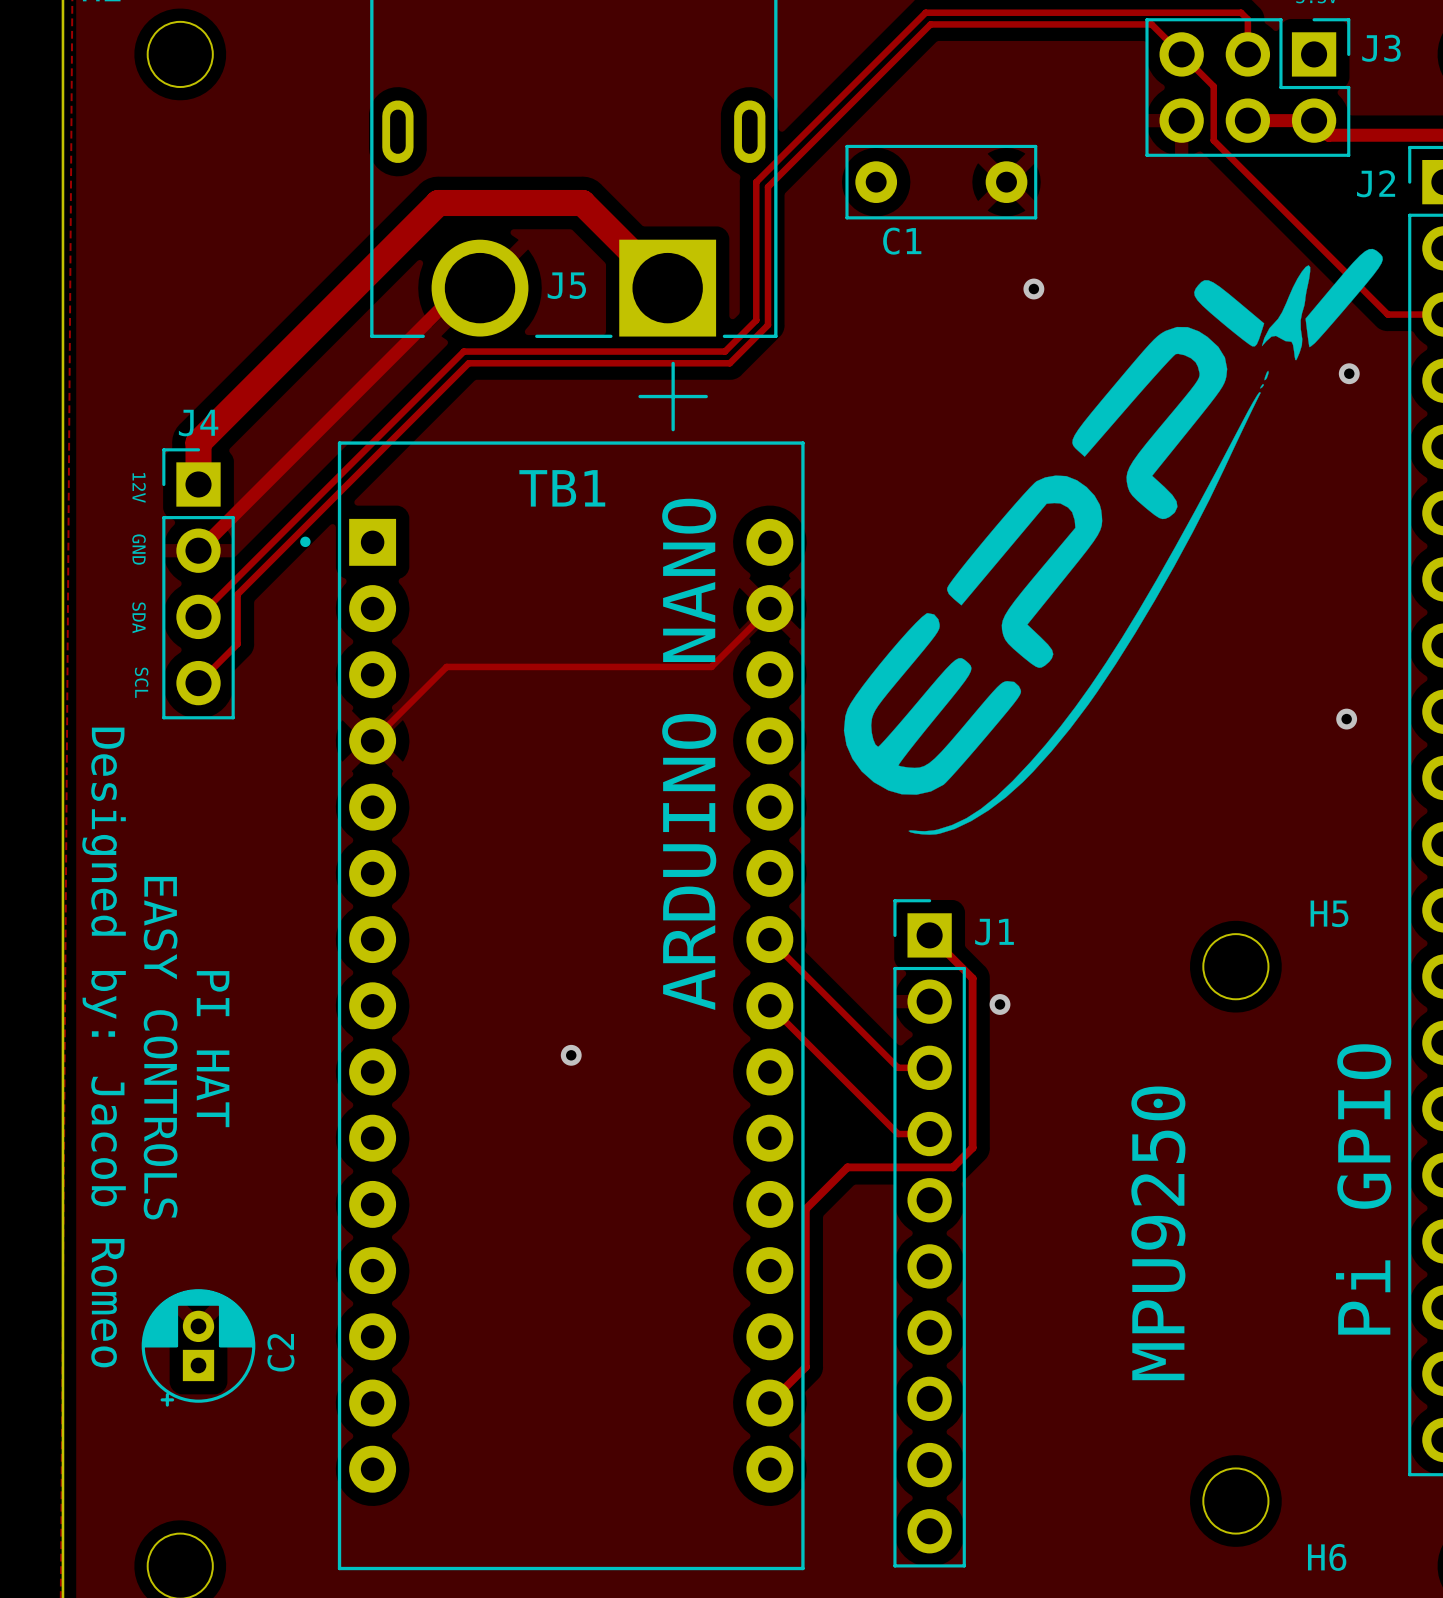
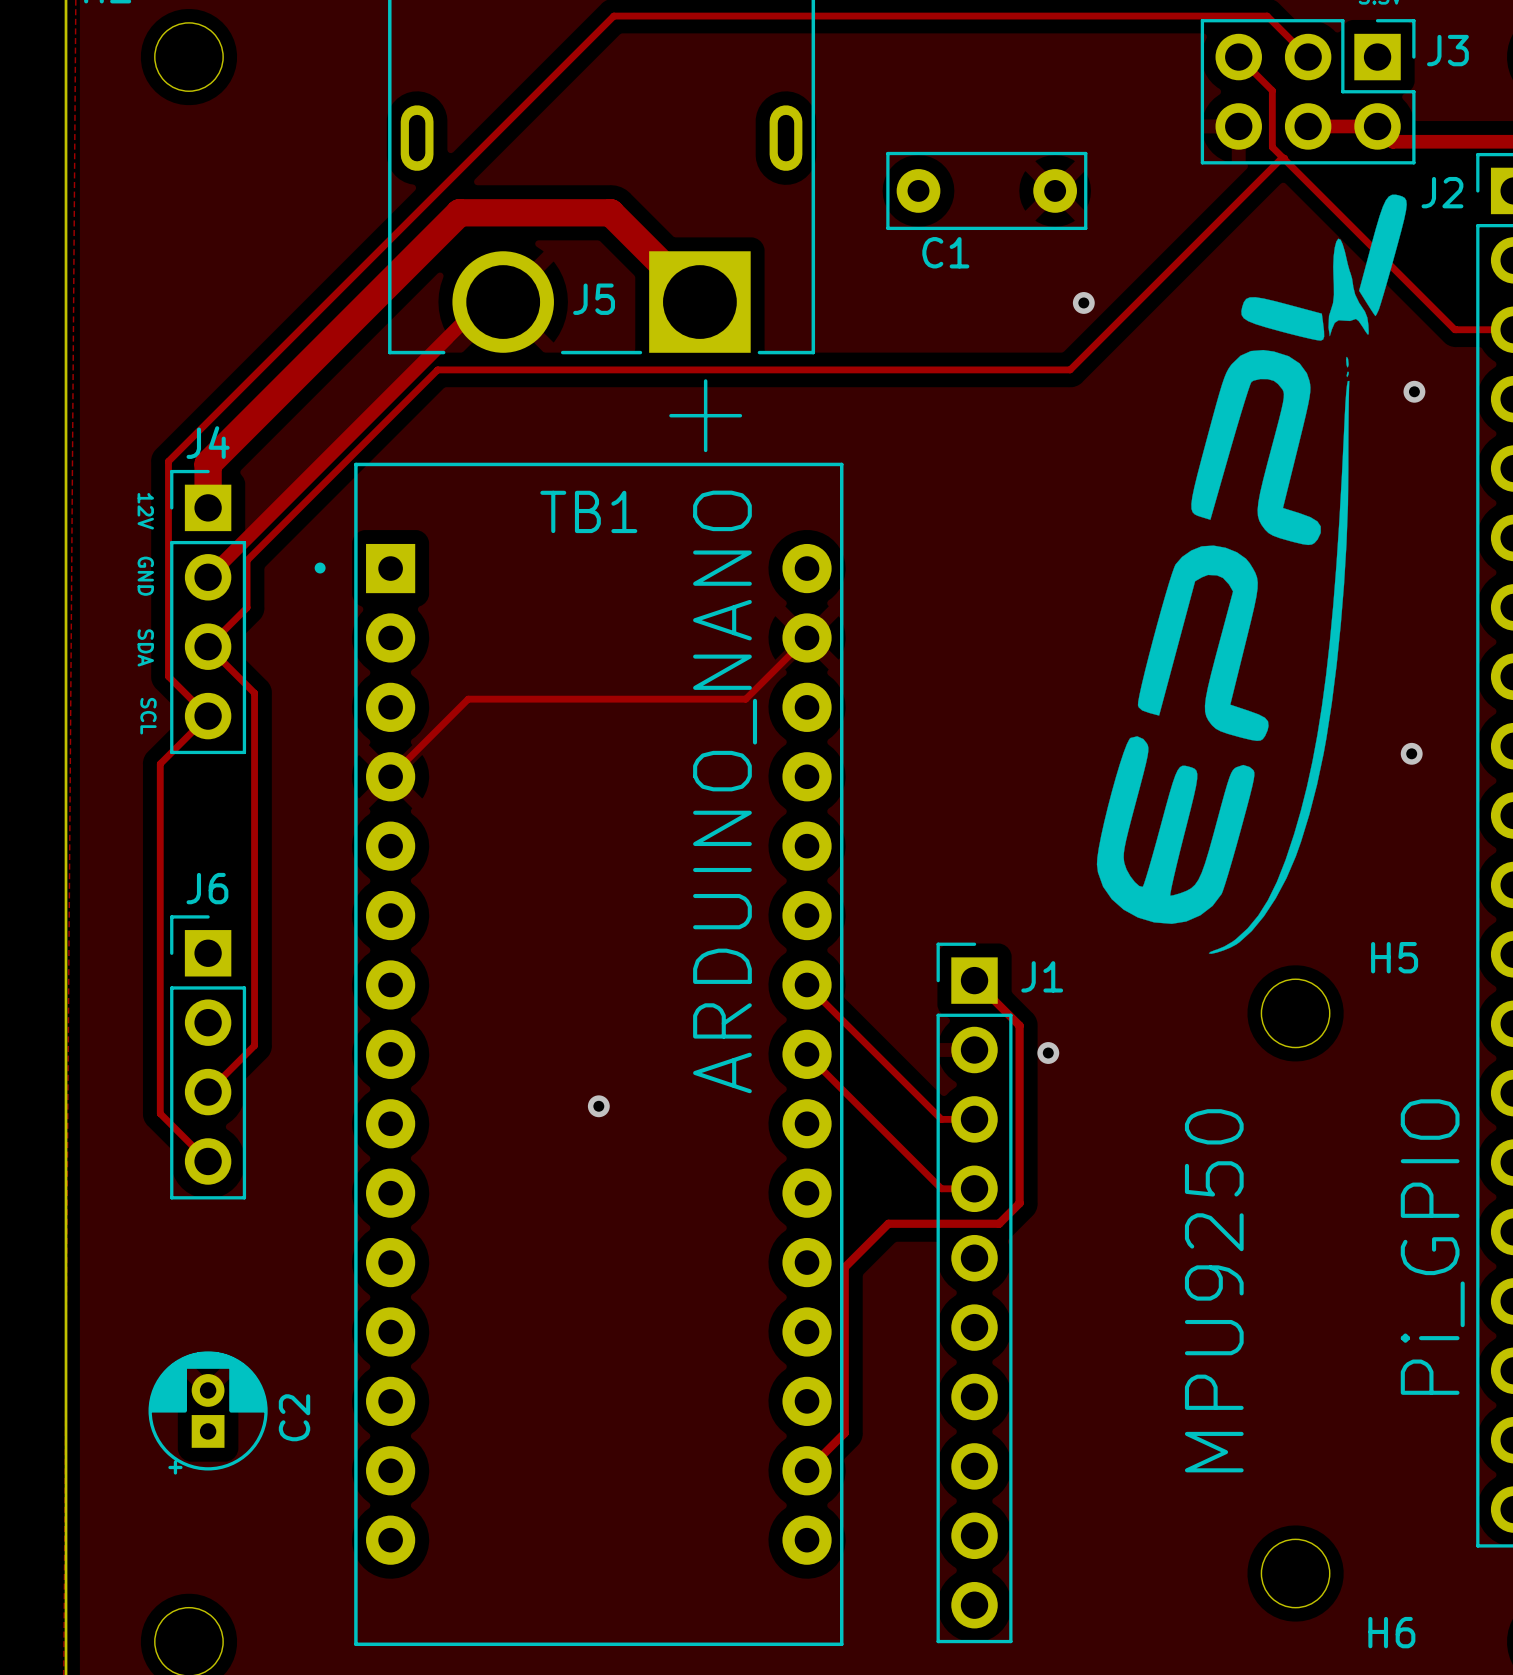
track: (1181, 54) (1151, 24) (930, 24) (768, 186) (768, 325) (729, 363) (468, 363) (237, 594) (237, 644) (198, 683) -> none
track: (1247, 54) (1247, 19) (1241, 12) (925, 12) (756, 182) (756, 320) (725, 351) (463, 351) (235, 579) -> (1284, 158) (1281, 158) (1070, 369) (437, 369) (247, 560) (247, 607)
track: none -> (1308, 57) (1267, 16) (613, 16) (168, 461) (168, 676) (208, 716) (160, 763) (160, 1113) (208, 1161)
drawing: none -> [1096, 194, 1407, 954]
drawing: [843, 248, 1383, 835] -> none
track: none -> (208, 646) (254, 693) (254, 1045) (208, 1092)
TB1 value: ARDUINO NANO (689, 754) -> ARDUINO_NANO (725, 791)
J6: none -> (208, 1057)
text: Designed by: Jacob Romeo (104, 1047) -> none
text: EASY CONTROLS (160, 1048) -> none
text: PI HAT (213, 1049) -> none
J2 value: Pi GPIO (1363, 1189) -> Pi_GPIO (1432, 1247)

